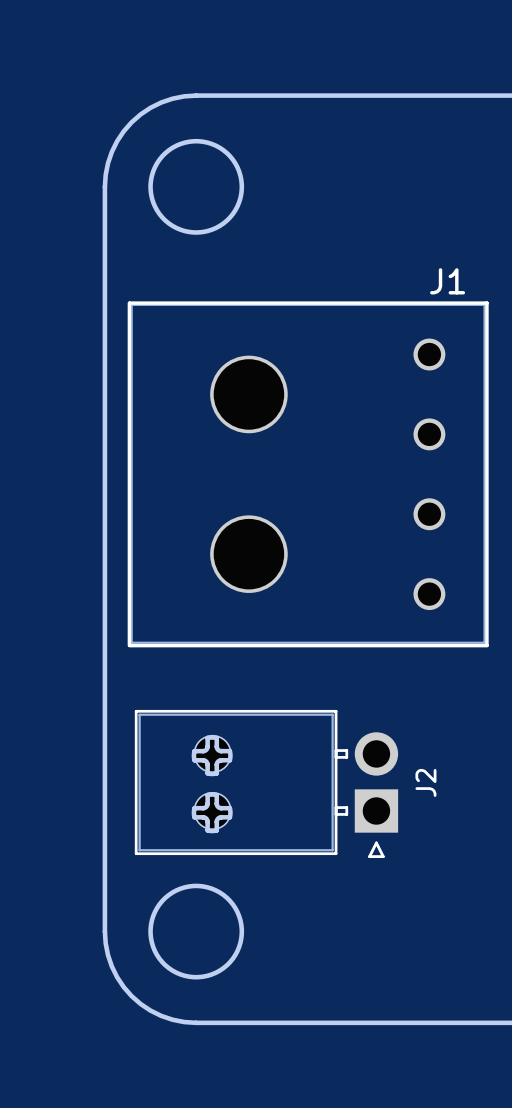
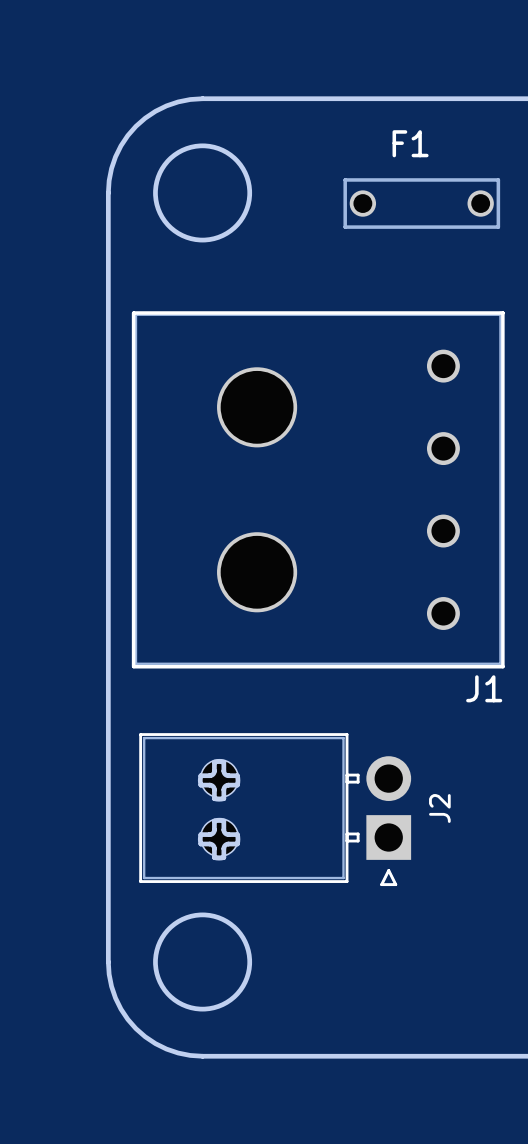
F1: none -> (421, 203)
J1 name position: J1 (447, 281) -> J1 (484, 688)

